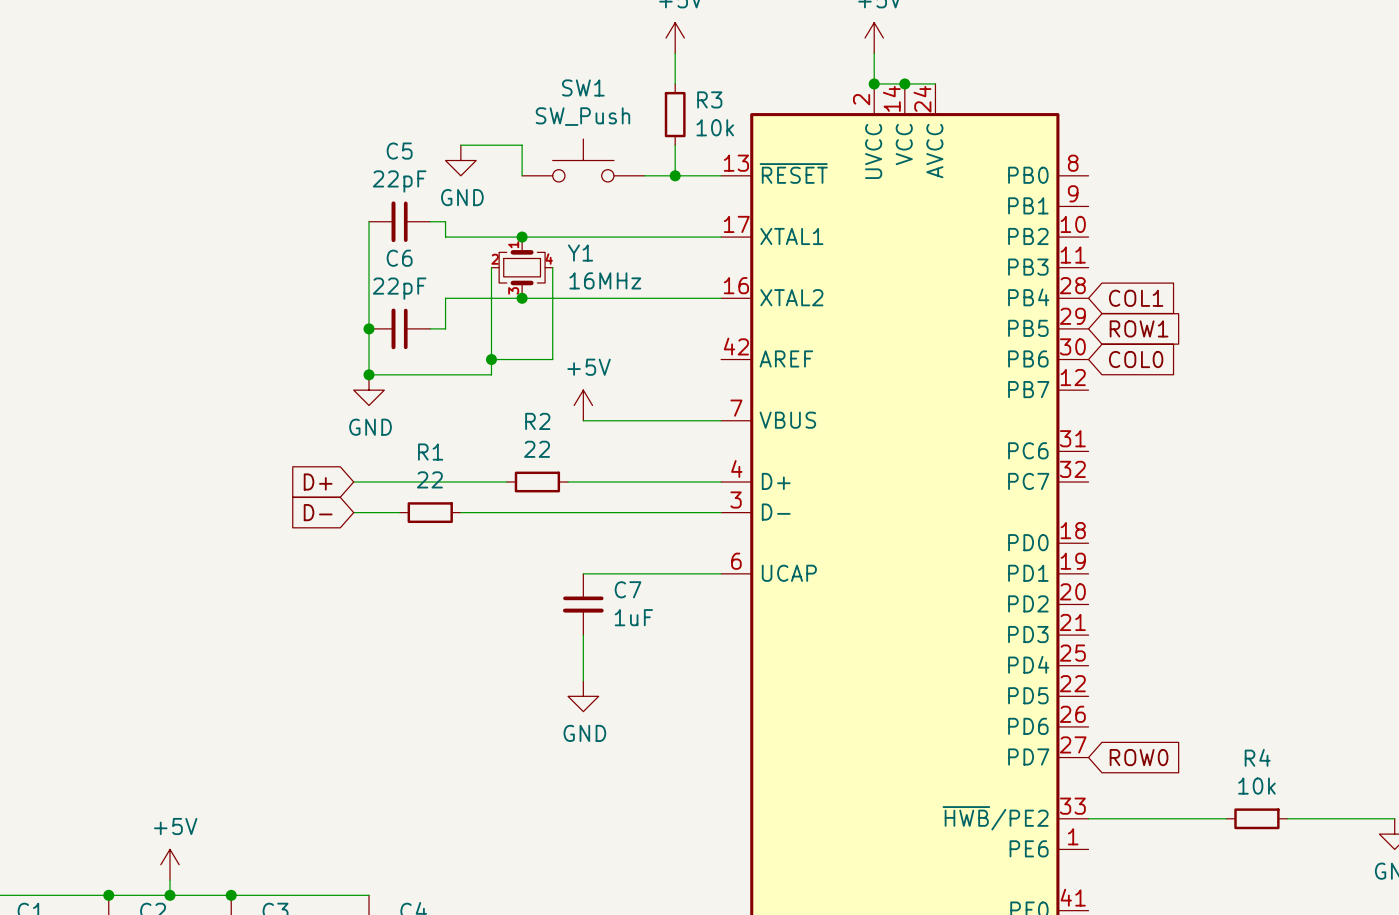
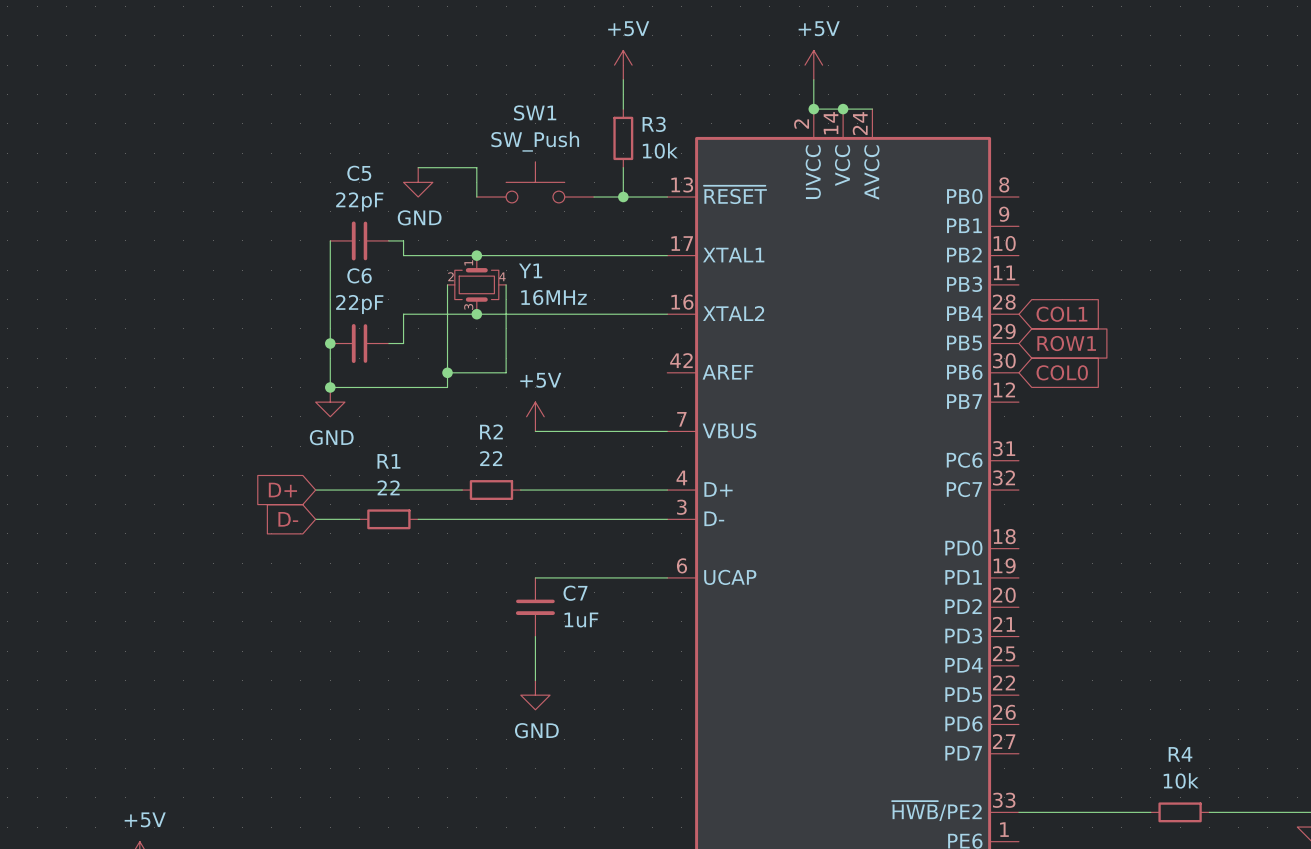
global label: ROW0 (1139, 757) -> none

